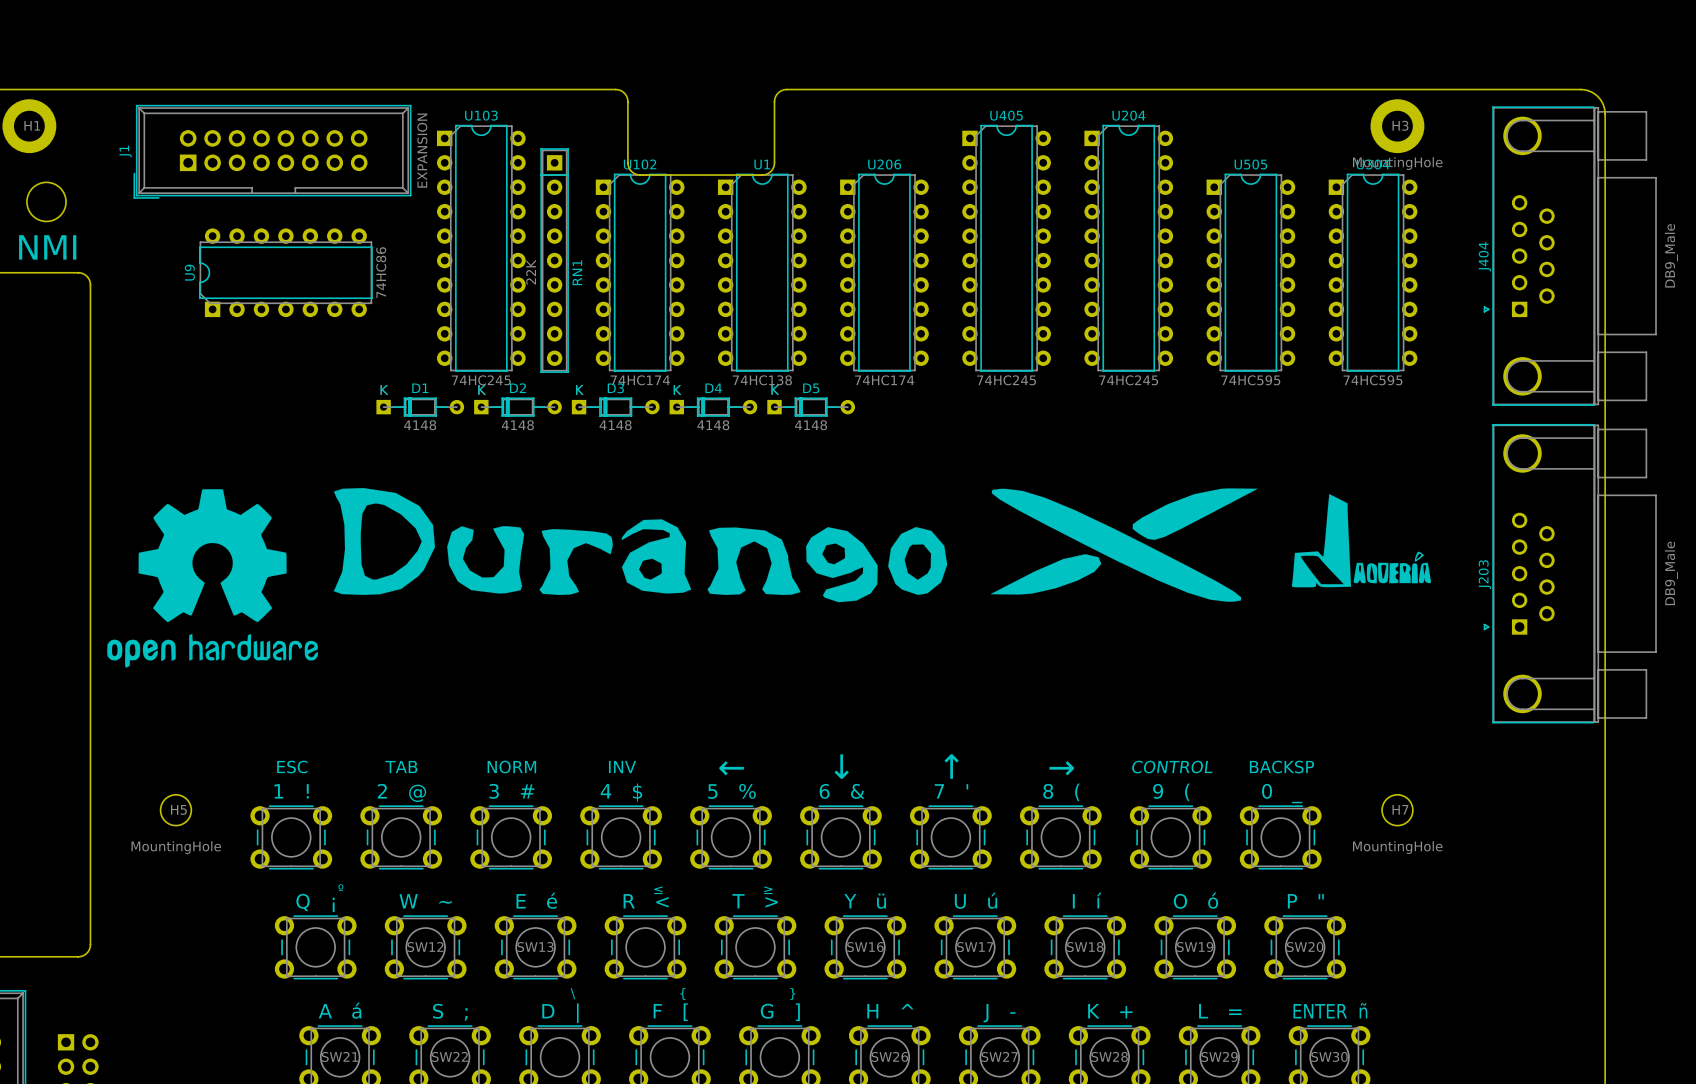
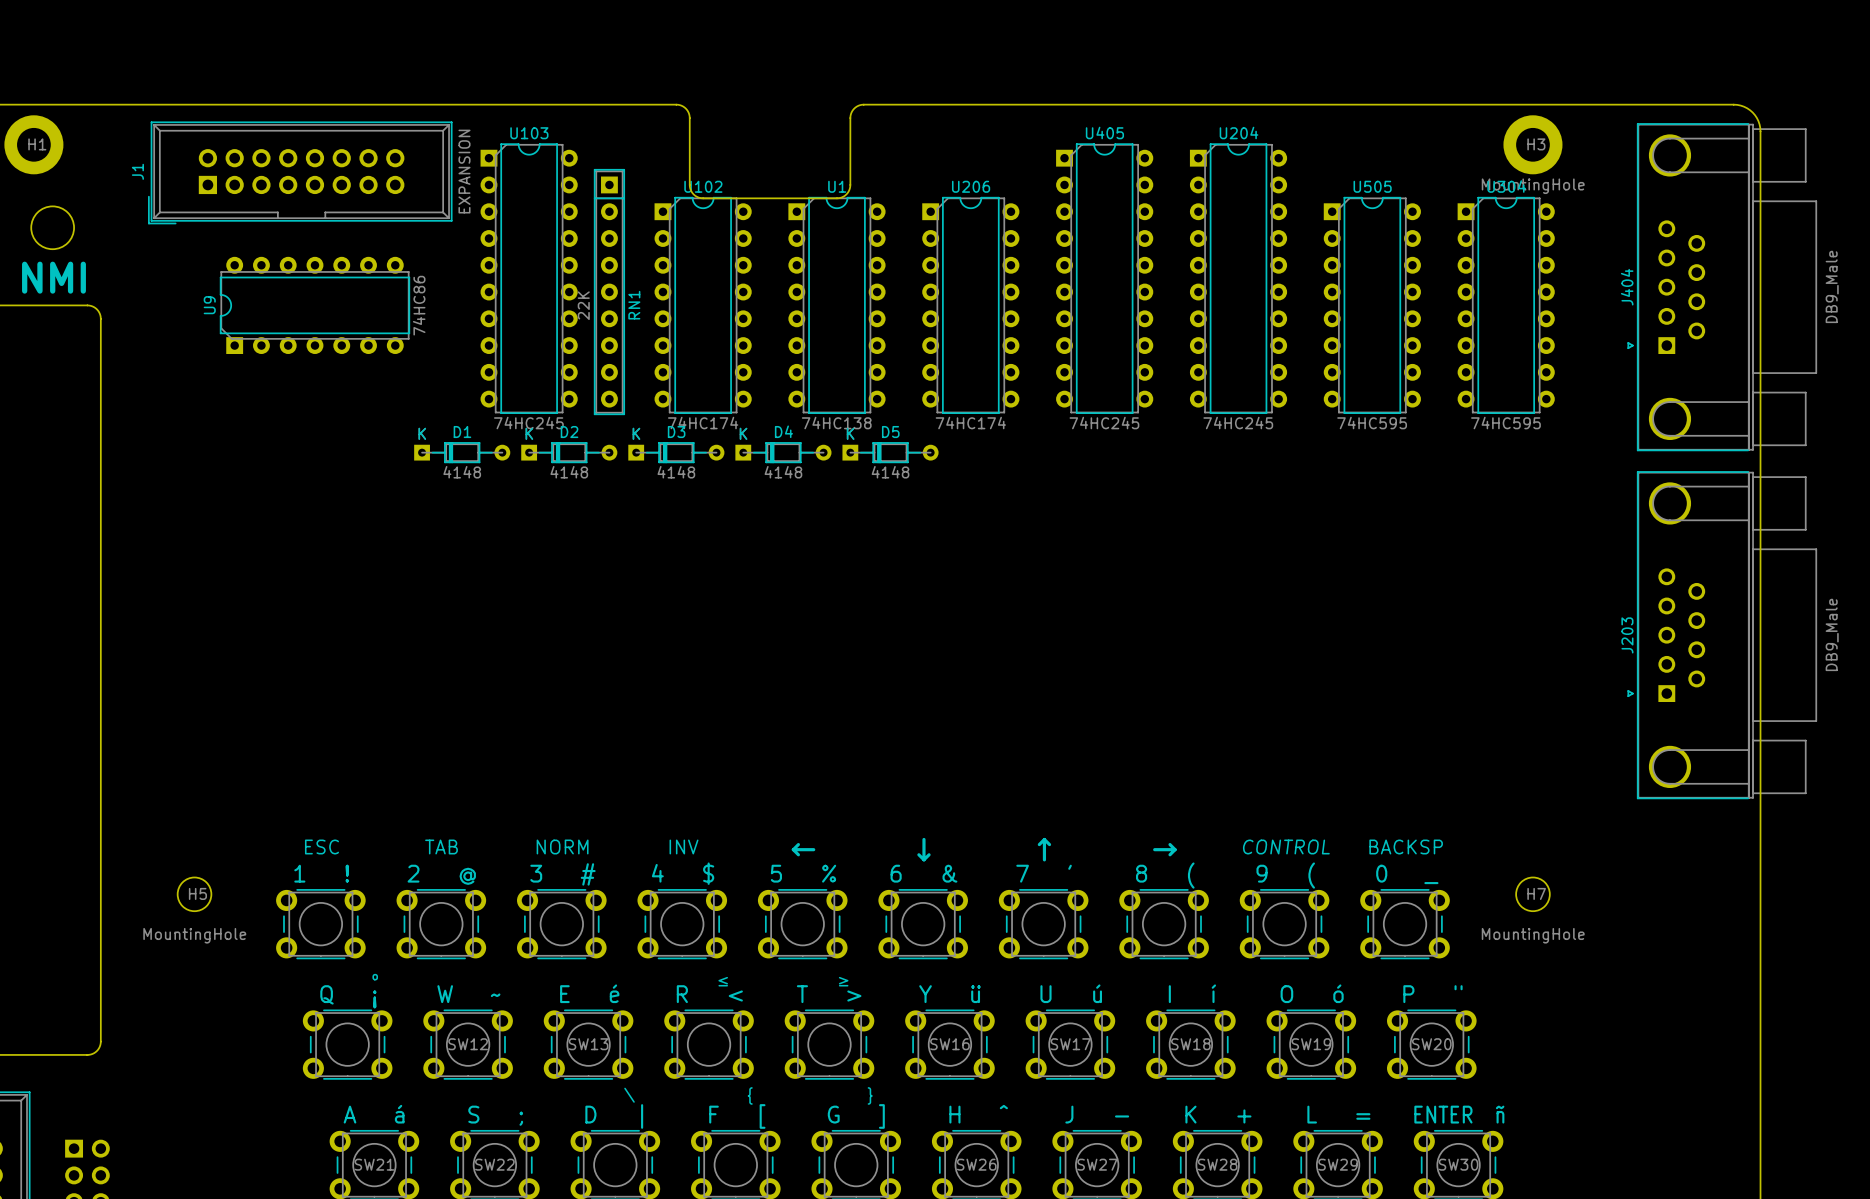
drawing: [333, 488, 1258, 603] -> none
drawing: [107, 489, 318, 668] -> none
drawing: [1291, 494, 1432, 588] -> none

